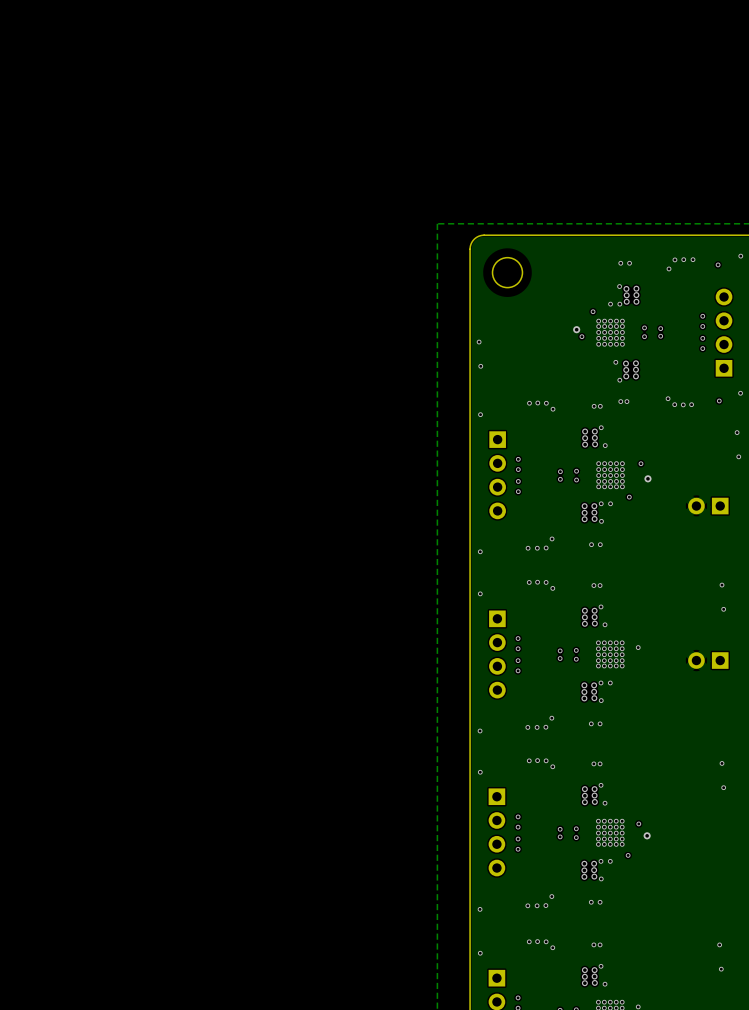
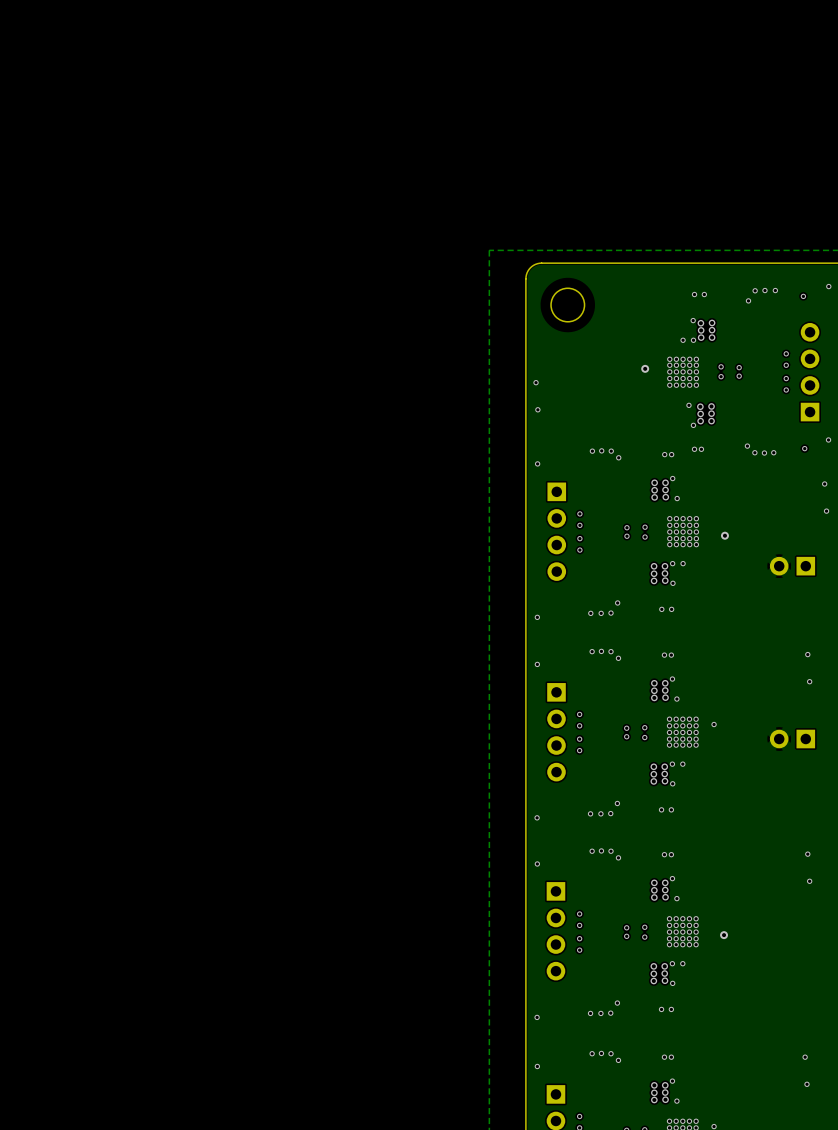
via: (593, 311) -> none
via: (581, 336) -> none
via: (641, 463) -> none
via: (629, 497) -> none
via: (638, 823) -> none
via: (628, 855) -> none

